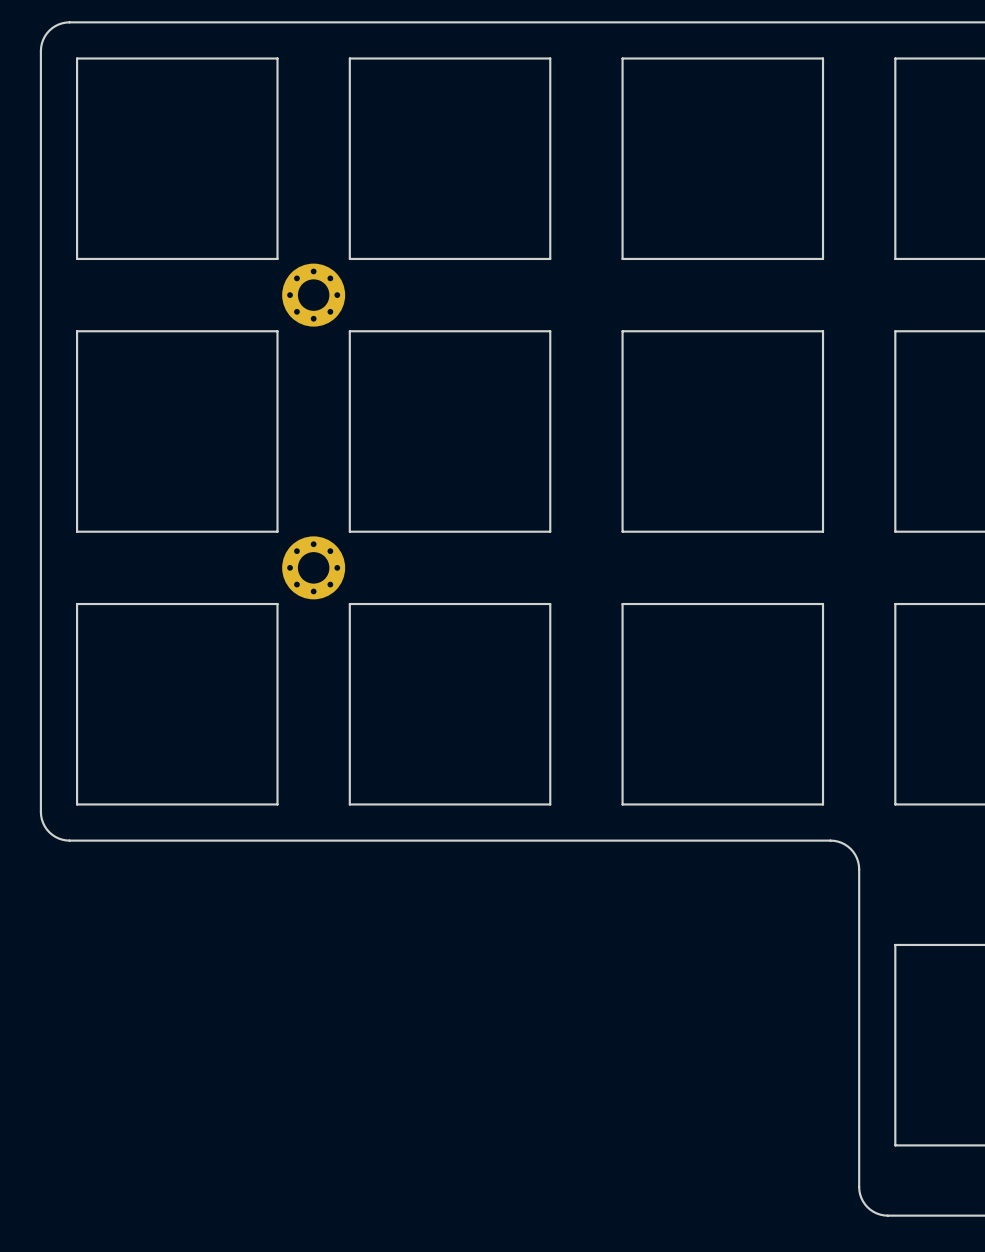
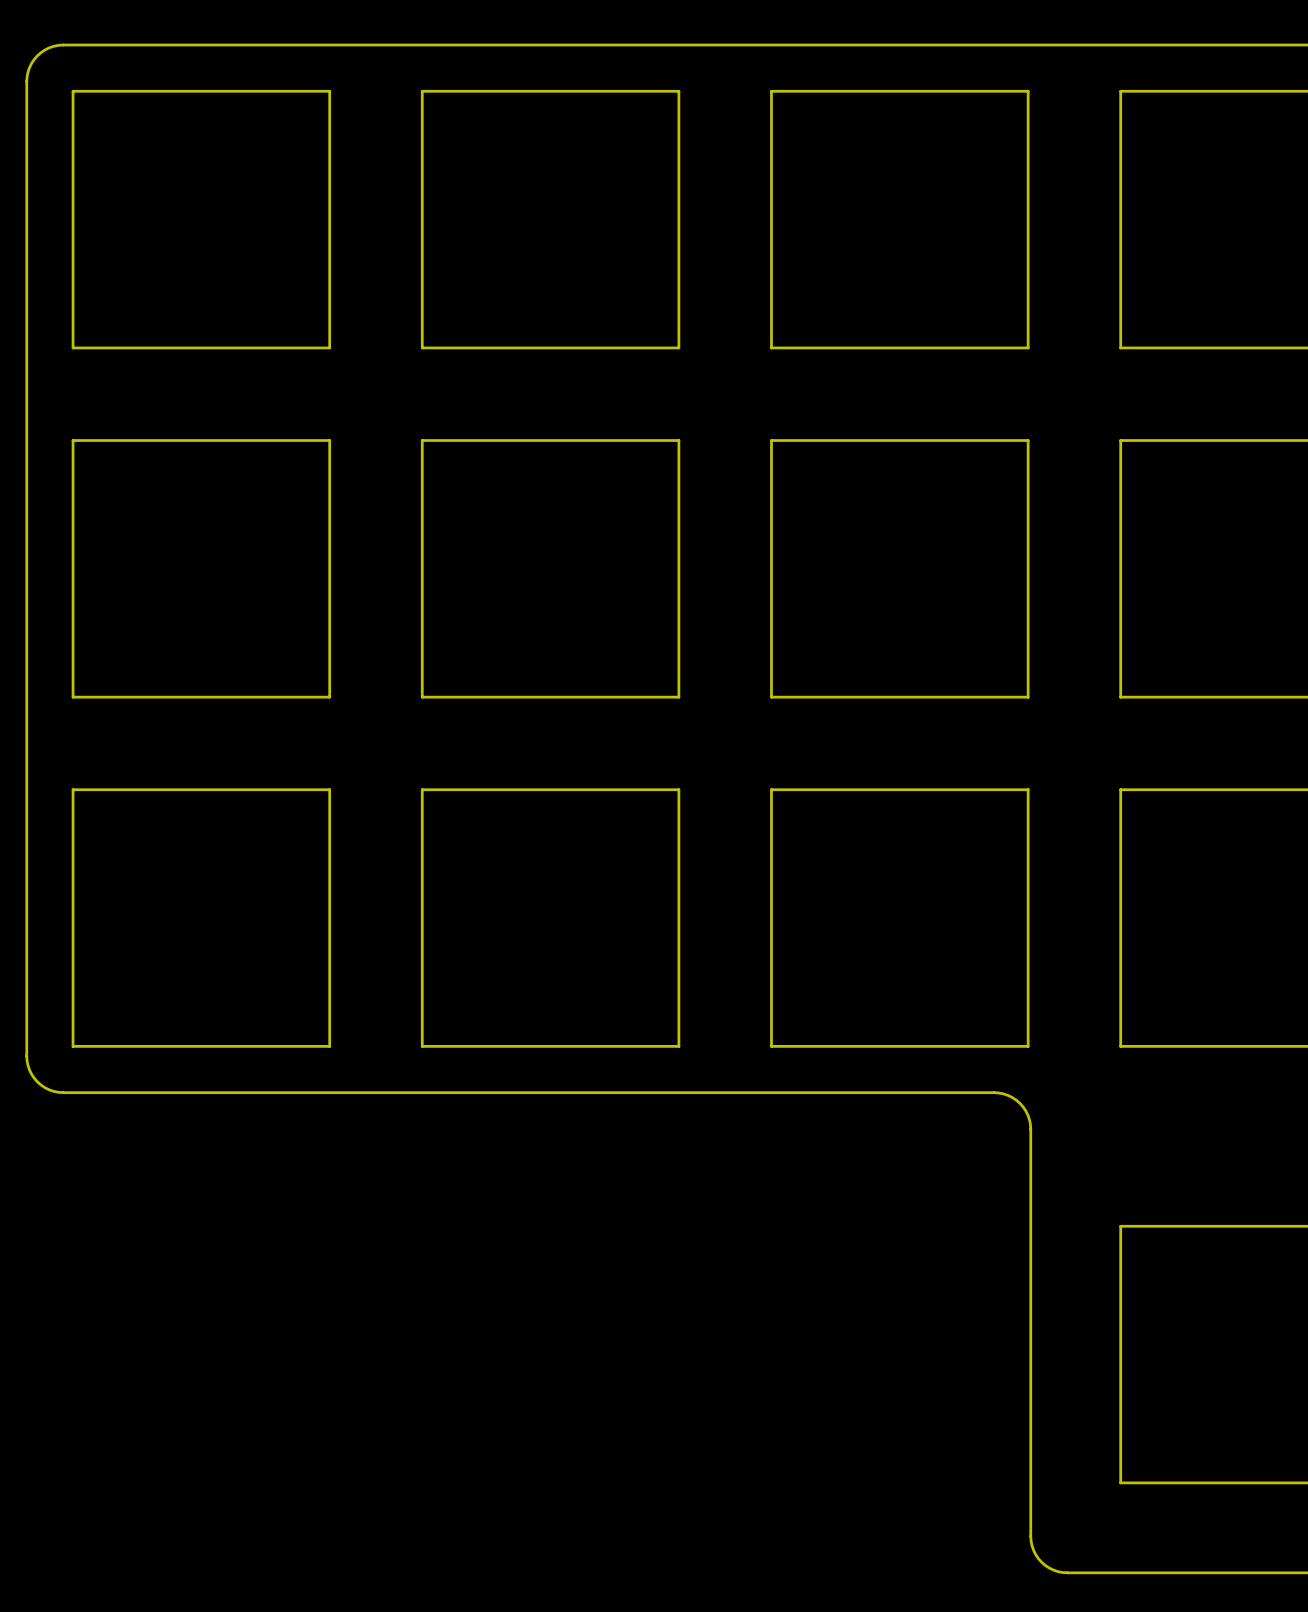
part: (313, 295) -> none
part: (313, 567) -> none
board edge: (796, 840) (830, 840) (841, 842) (850, 849) (858, 861) (859, 1190) (867, 1207) (876, 1213) (887, 1215) -> (994, 1092) (1008, 1095) (1020, 1103) (1027, 1115) (1030, 1124) (1032, 1545) (1041, 1562) (1053, 1570) (1067, 1572) (1111, 1572)

